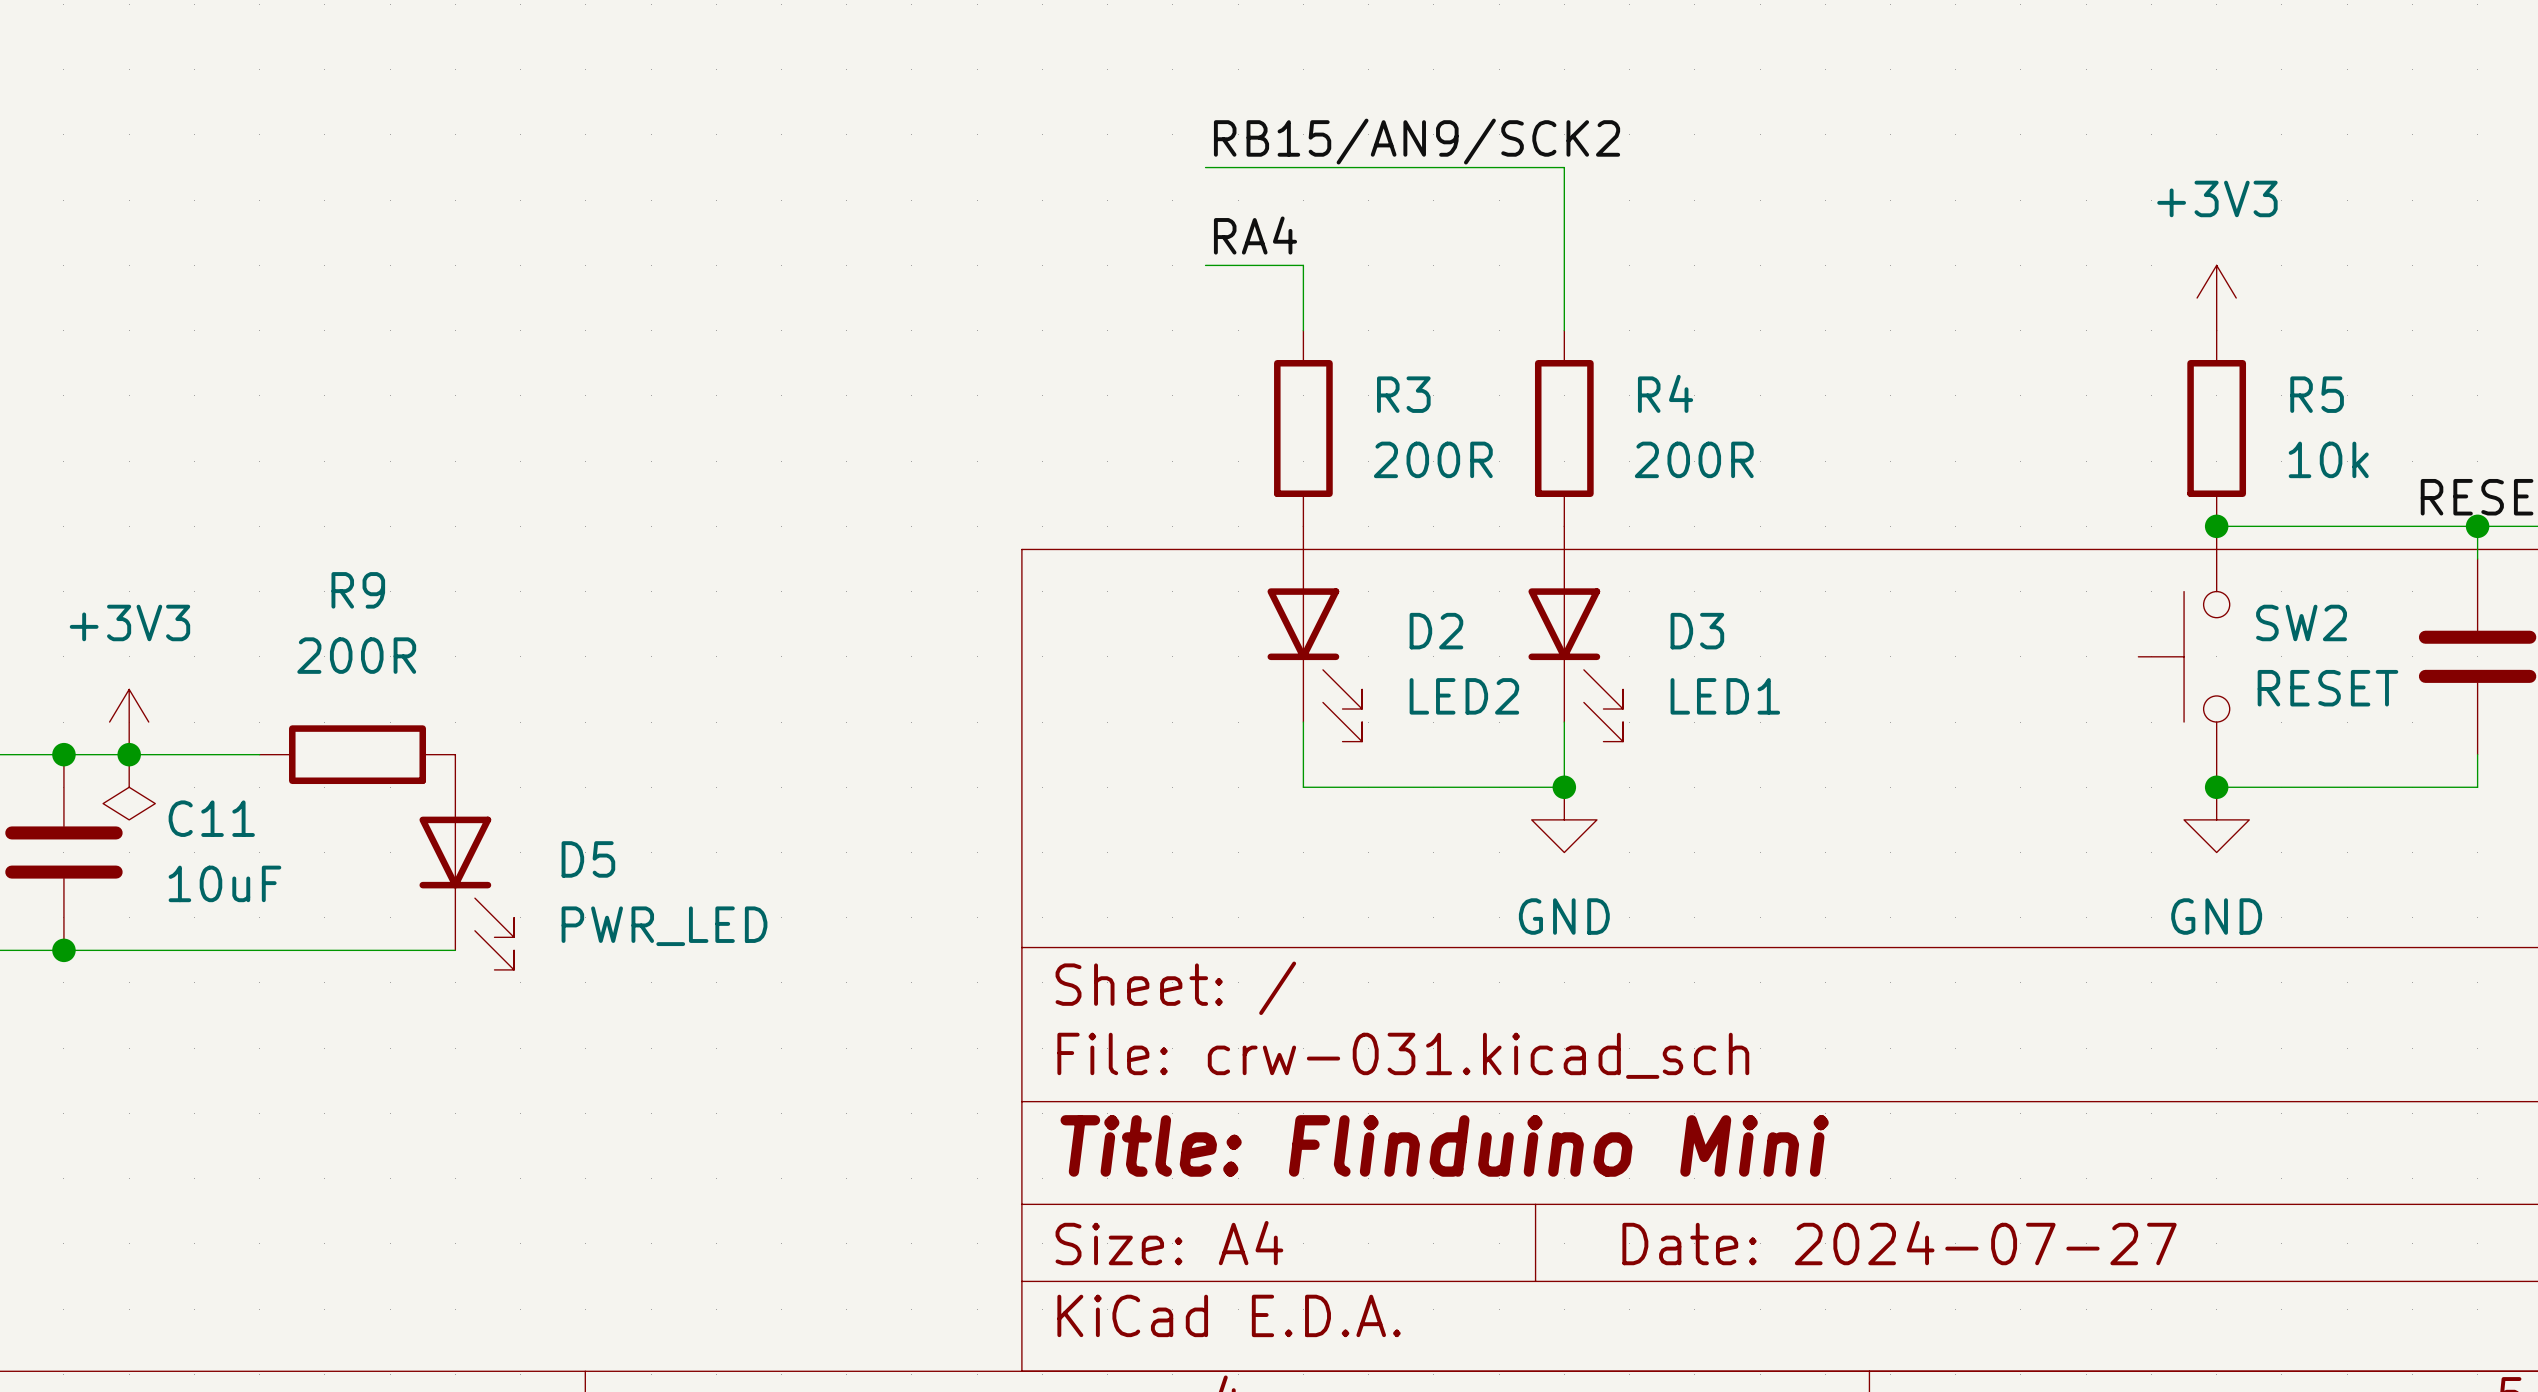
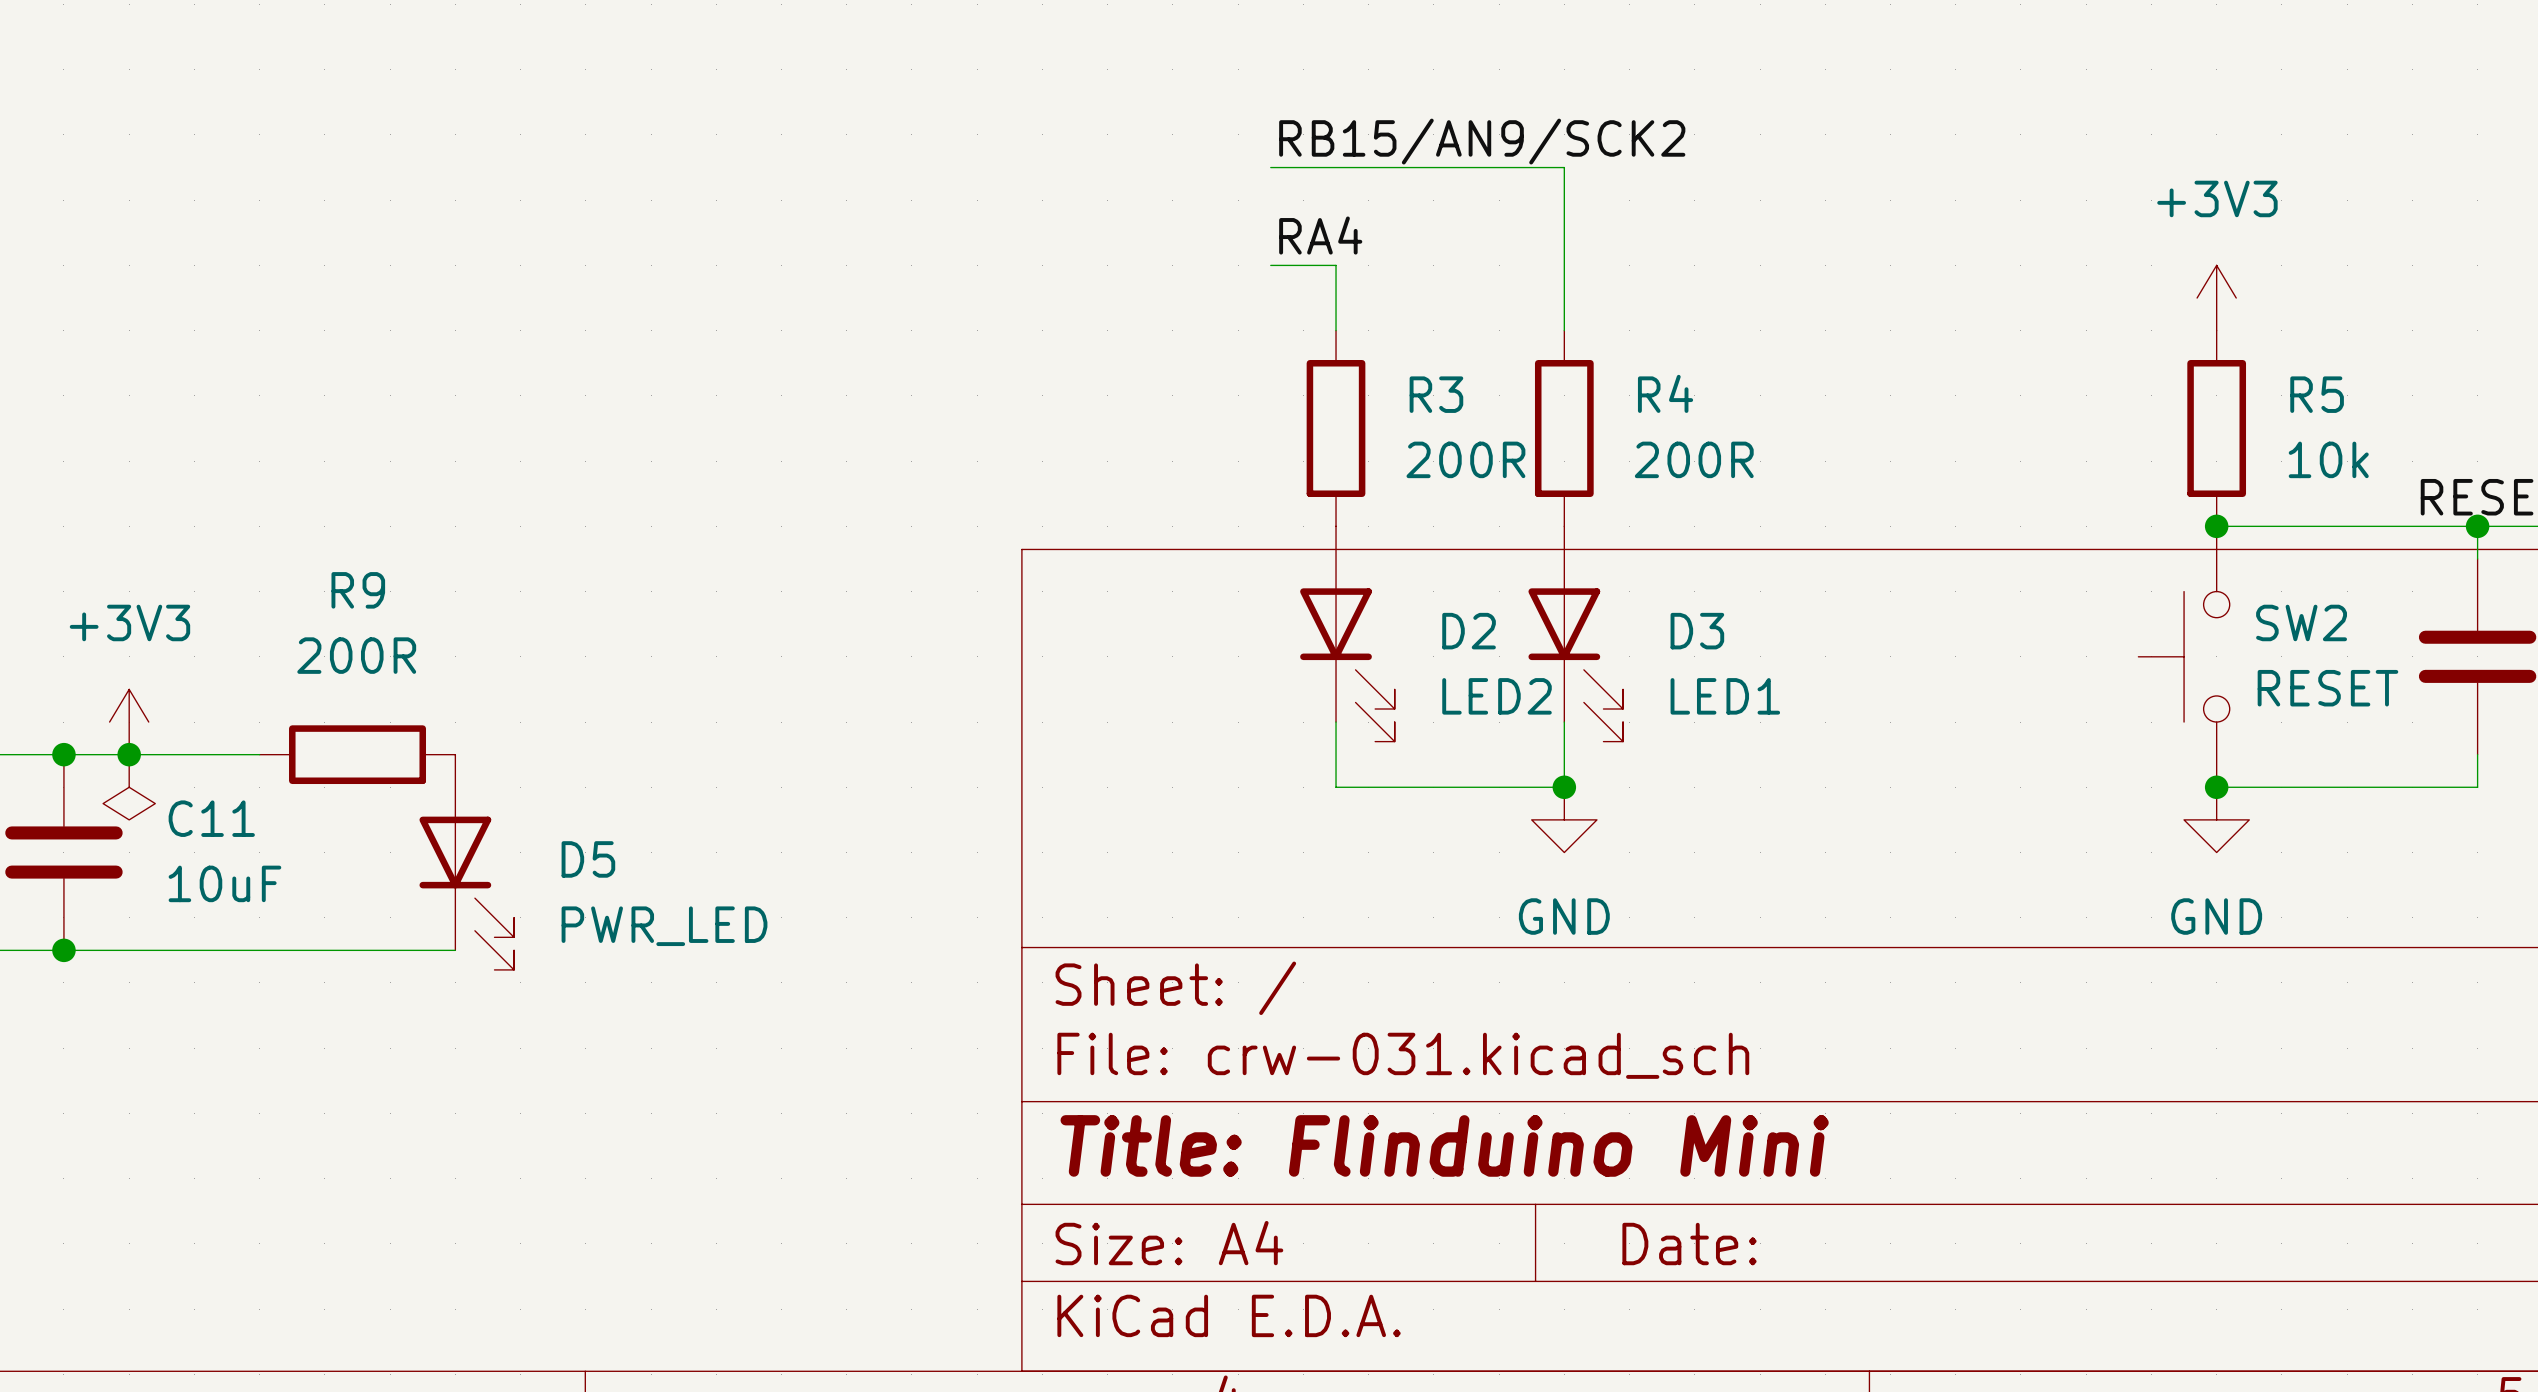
label position: RB15/AN9/SCK2 (1417, 141) -> RB15/AN9/SCK2 (1482, 141)
wire: (1205, 167) (1270, 167) -> none
label position: RA4 (1255, 235) -> RA4 (1320, 235)
wire: (1205, 265) (1270, 265) -> none
wire: (1303, 265) (1303, 330) -> (1303, 265) (1336, 265) (1336, 330)
R3 position: (1303, 428) -> (1336, 428)
D2 position: (1314, 633) -> (1347, 633)
wire: (1303, 722) (1303, 787) (1336, 787) -> (1336, 722) (1336, 787)
title block: Date: 2024-07-27 (1899, 1243) -> Date: (1689, 1244)

